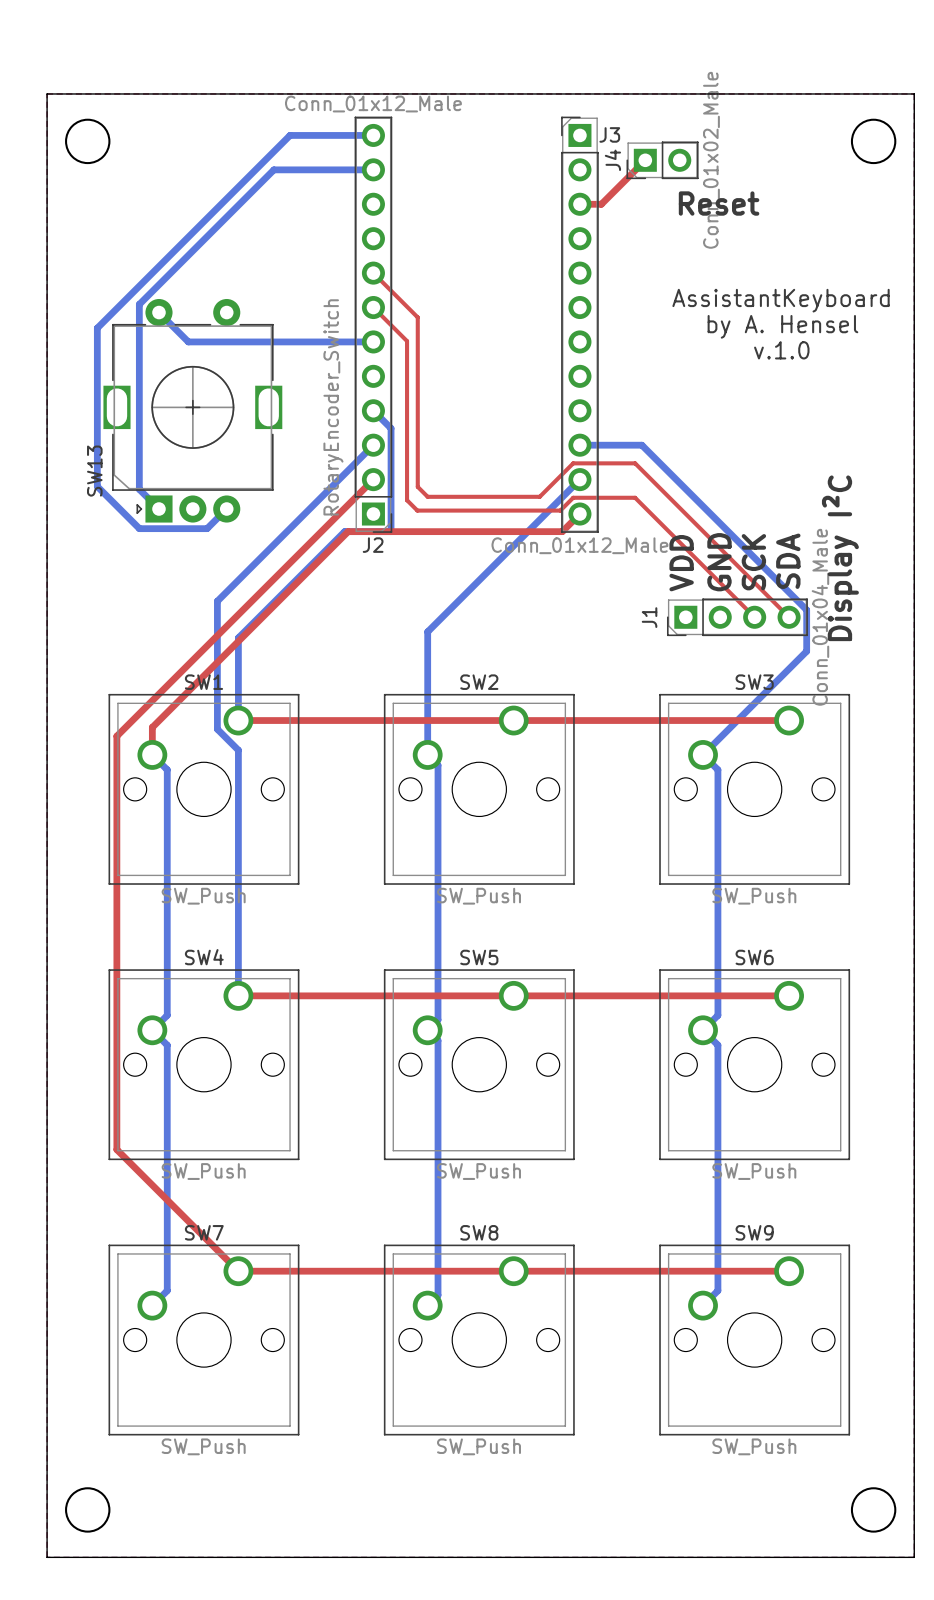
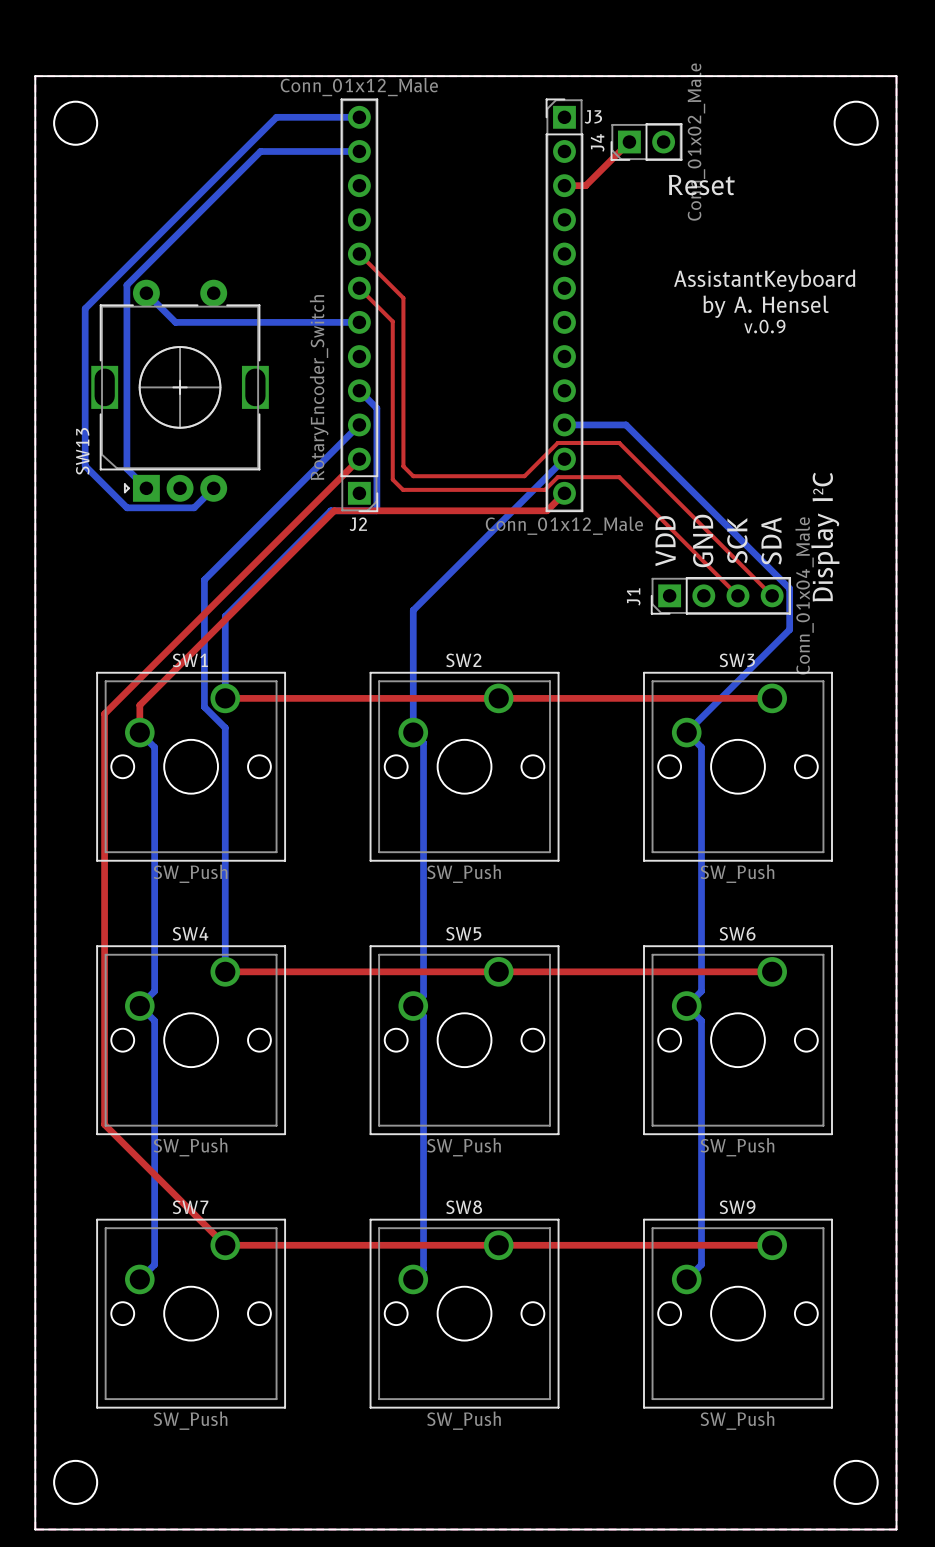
text: v.1.0 (781, 350) -> v.0.9 (764, 326)

